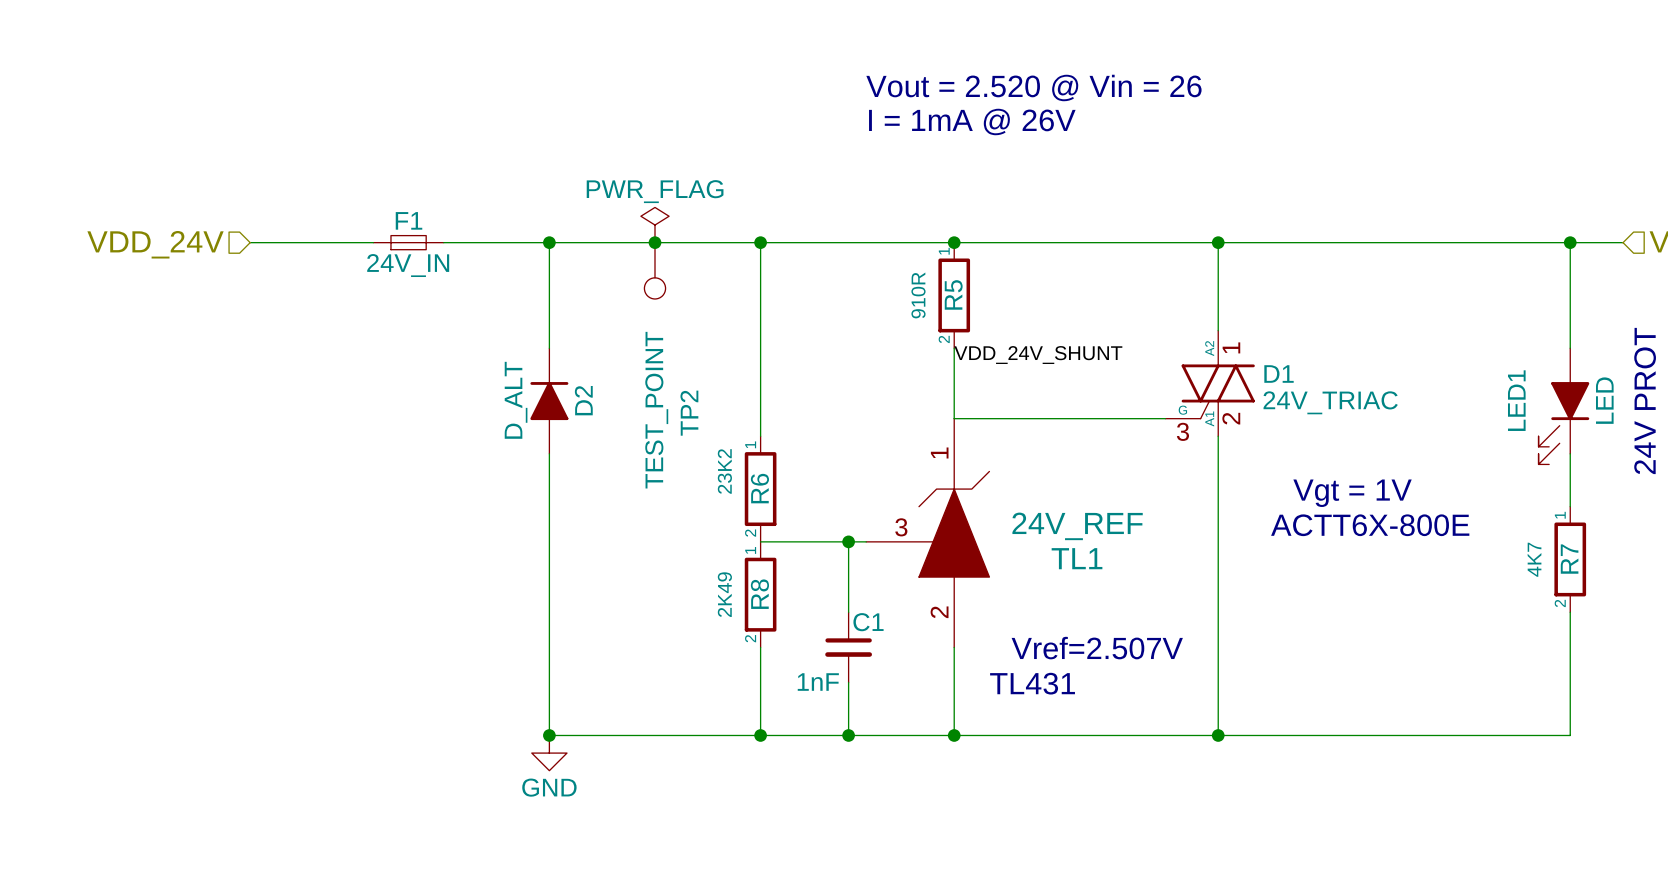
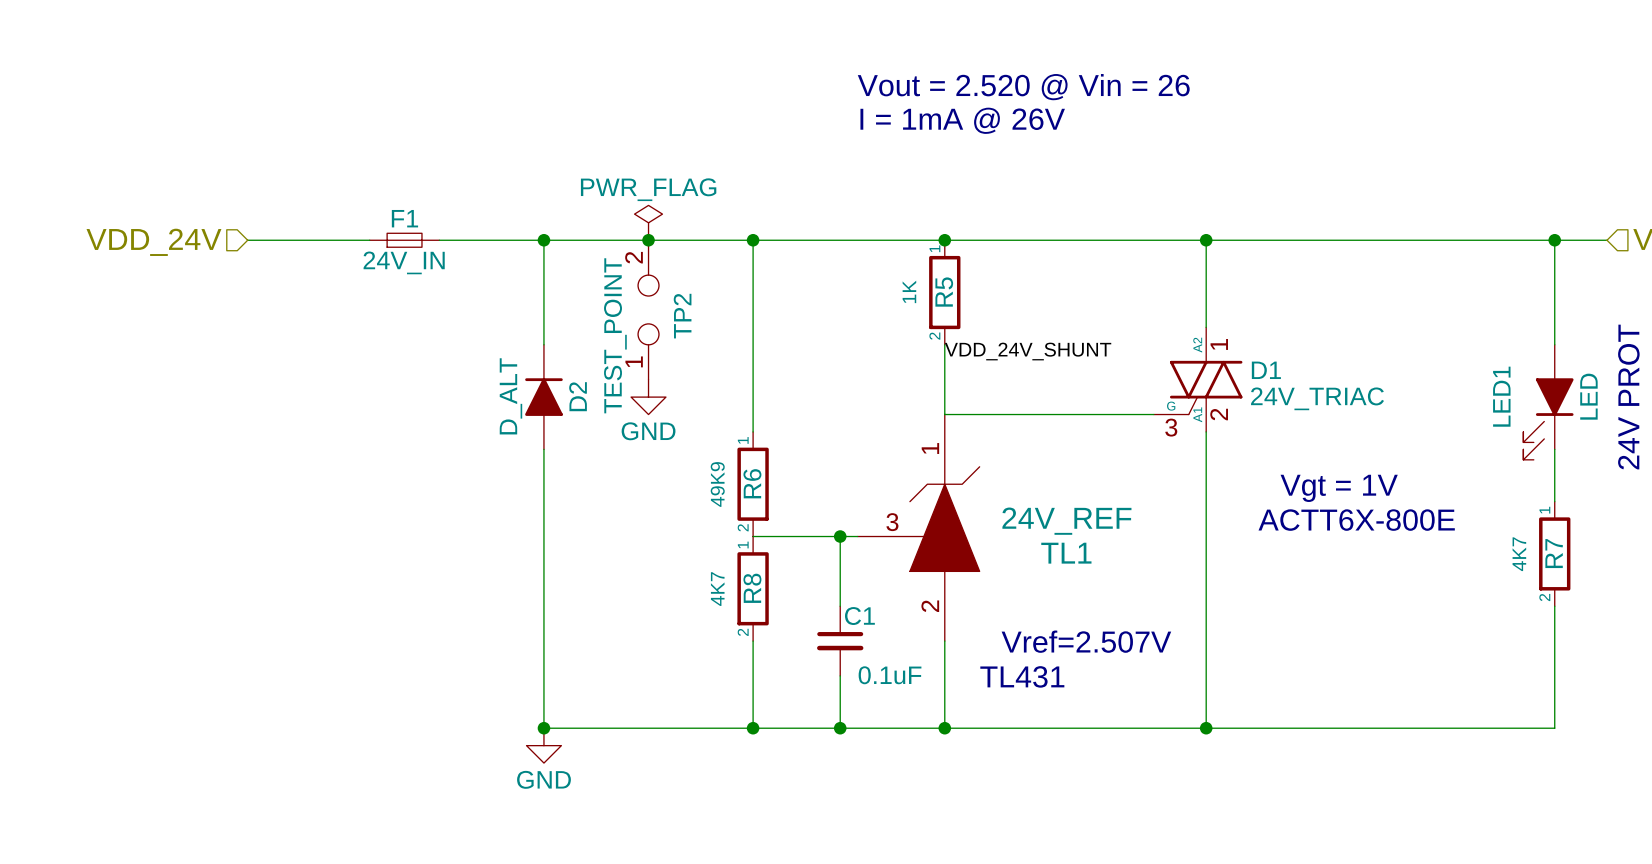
TP2 symbol: [644, 242, 666, 299] -> [638, 240, 659, 380]
R5 value: 910R (918, 295) -> 1K (909, 291)
power symbol: none -> GND (648, 397)
TP2 value position: TEST_POINT (656, 410) -> TEST_POINT (615, 335)
TP2 name position: TP2 (689, 413) -> TP2 (682, 316)
R6 value: 23K2 (724, 471) -> 49K9 (717, 484)
R8 value: 2K49 (724, 594) -> 4K7 (717, 589)
C1 value: 1nF (818, 682) -> 0.1uF (890, 675)

